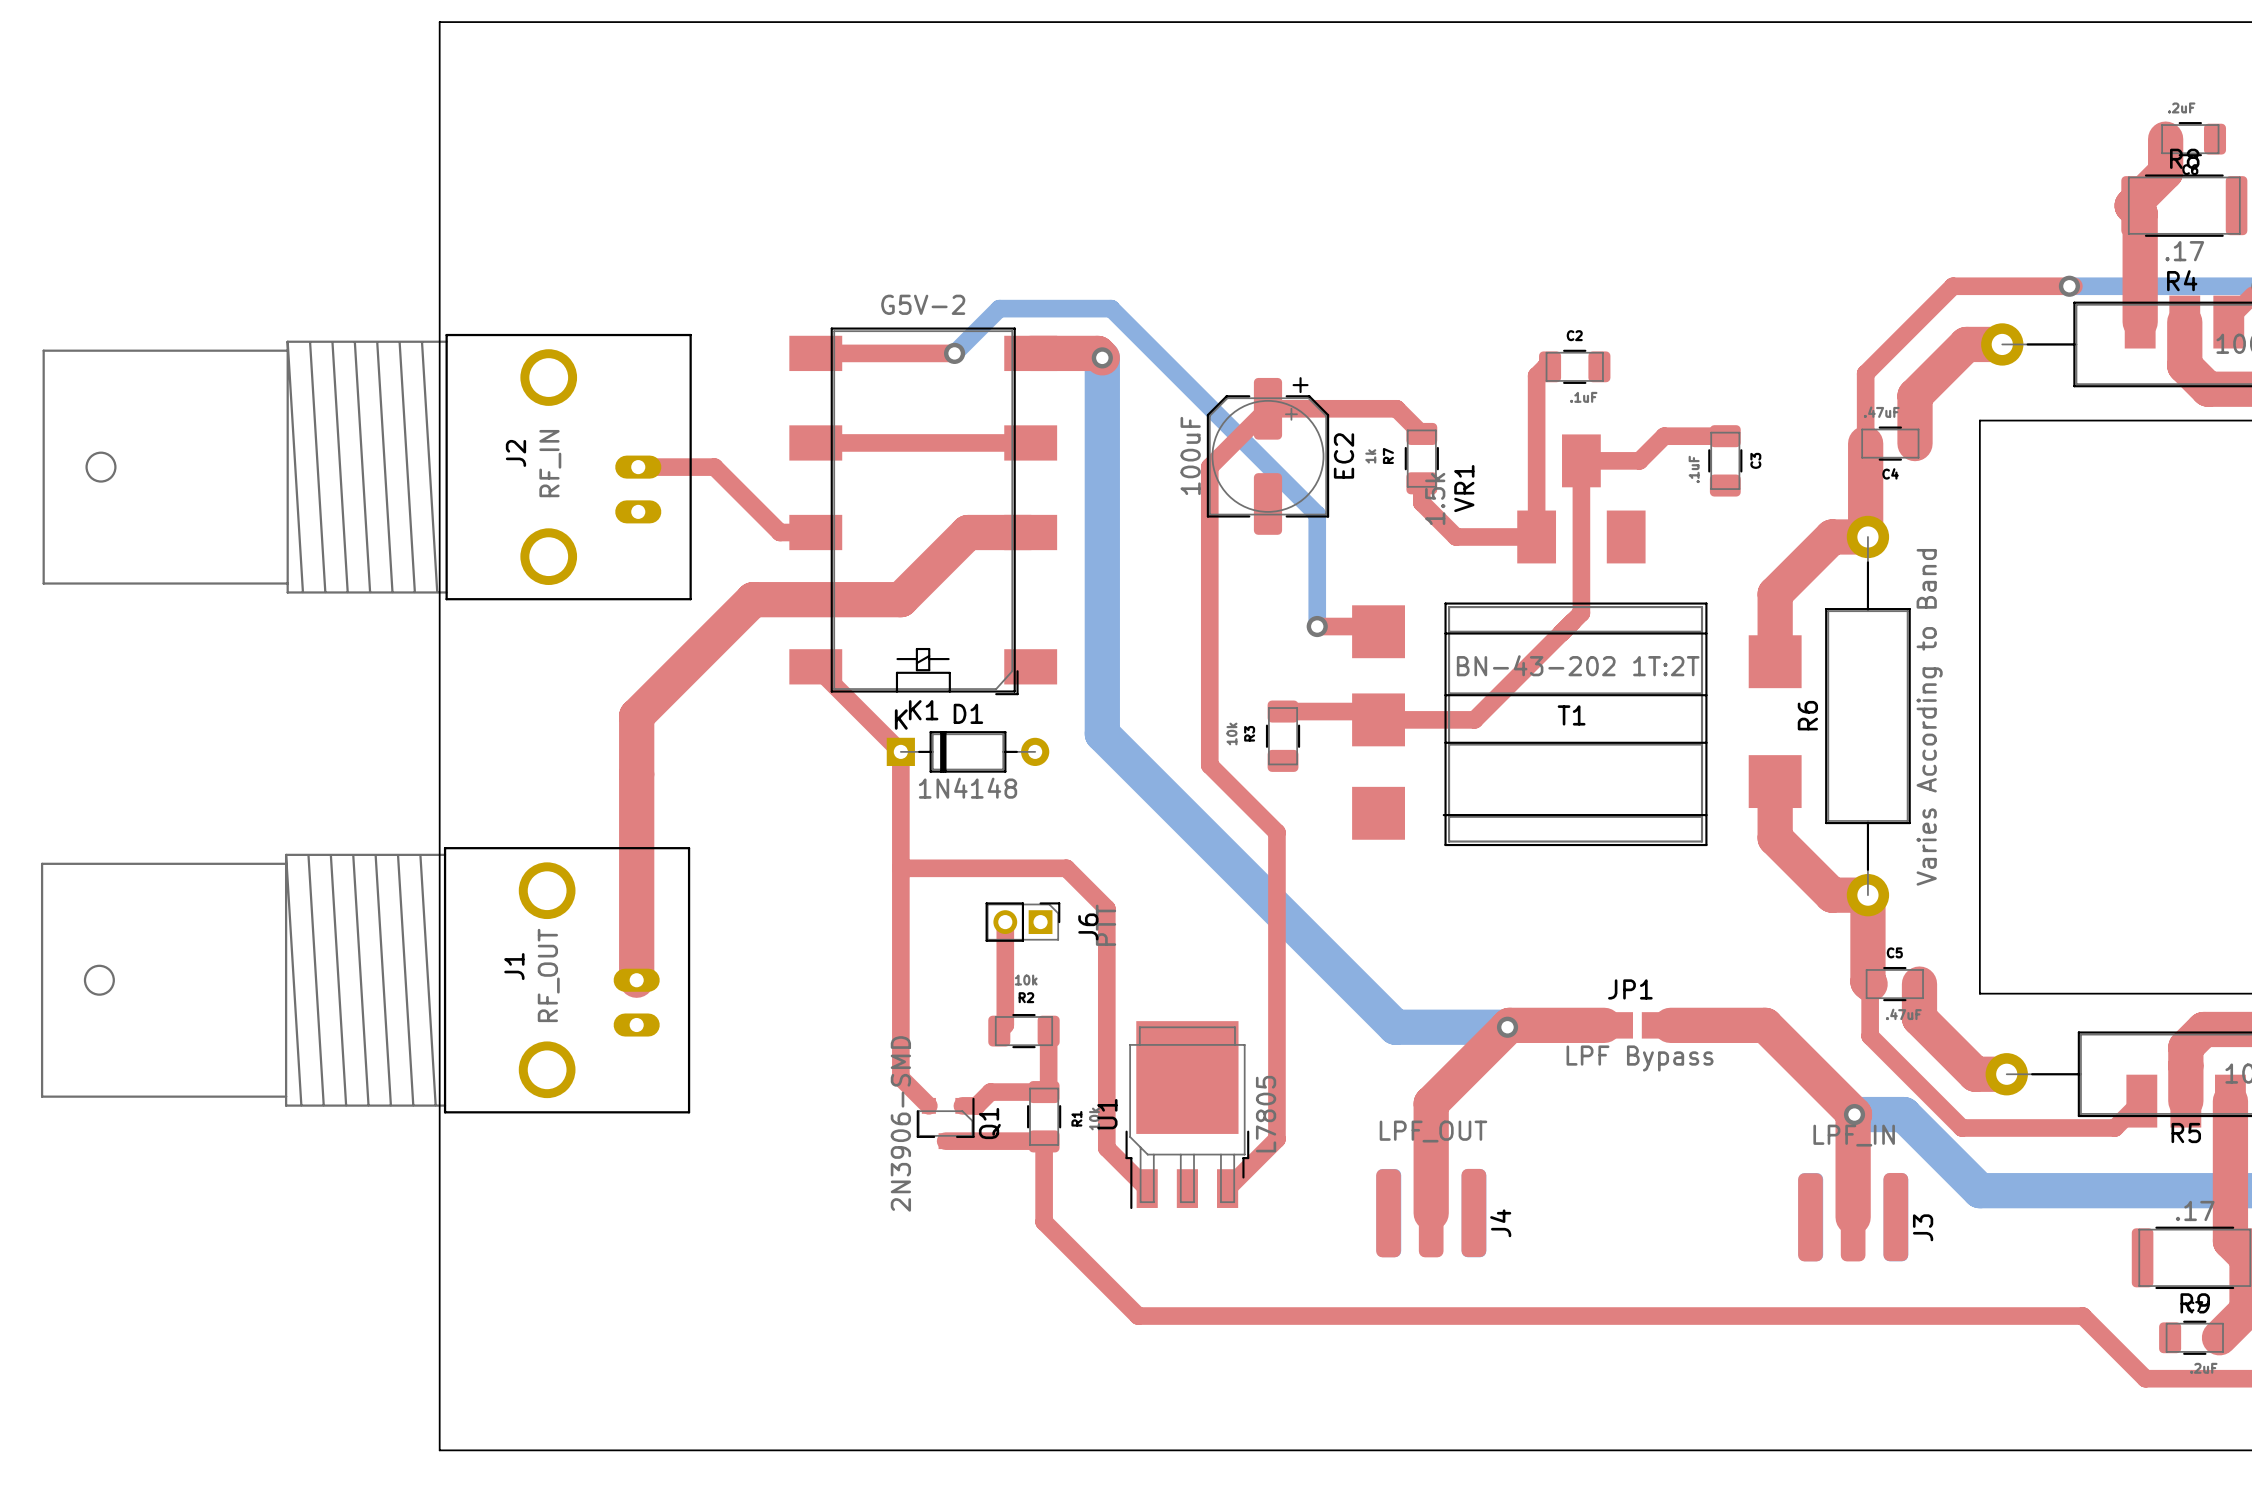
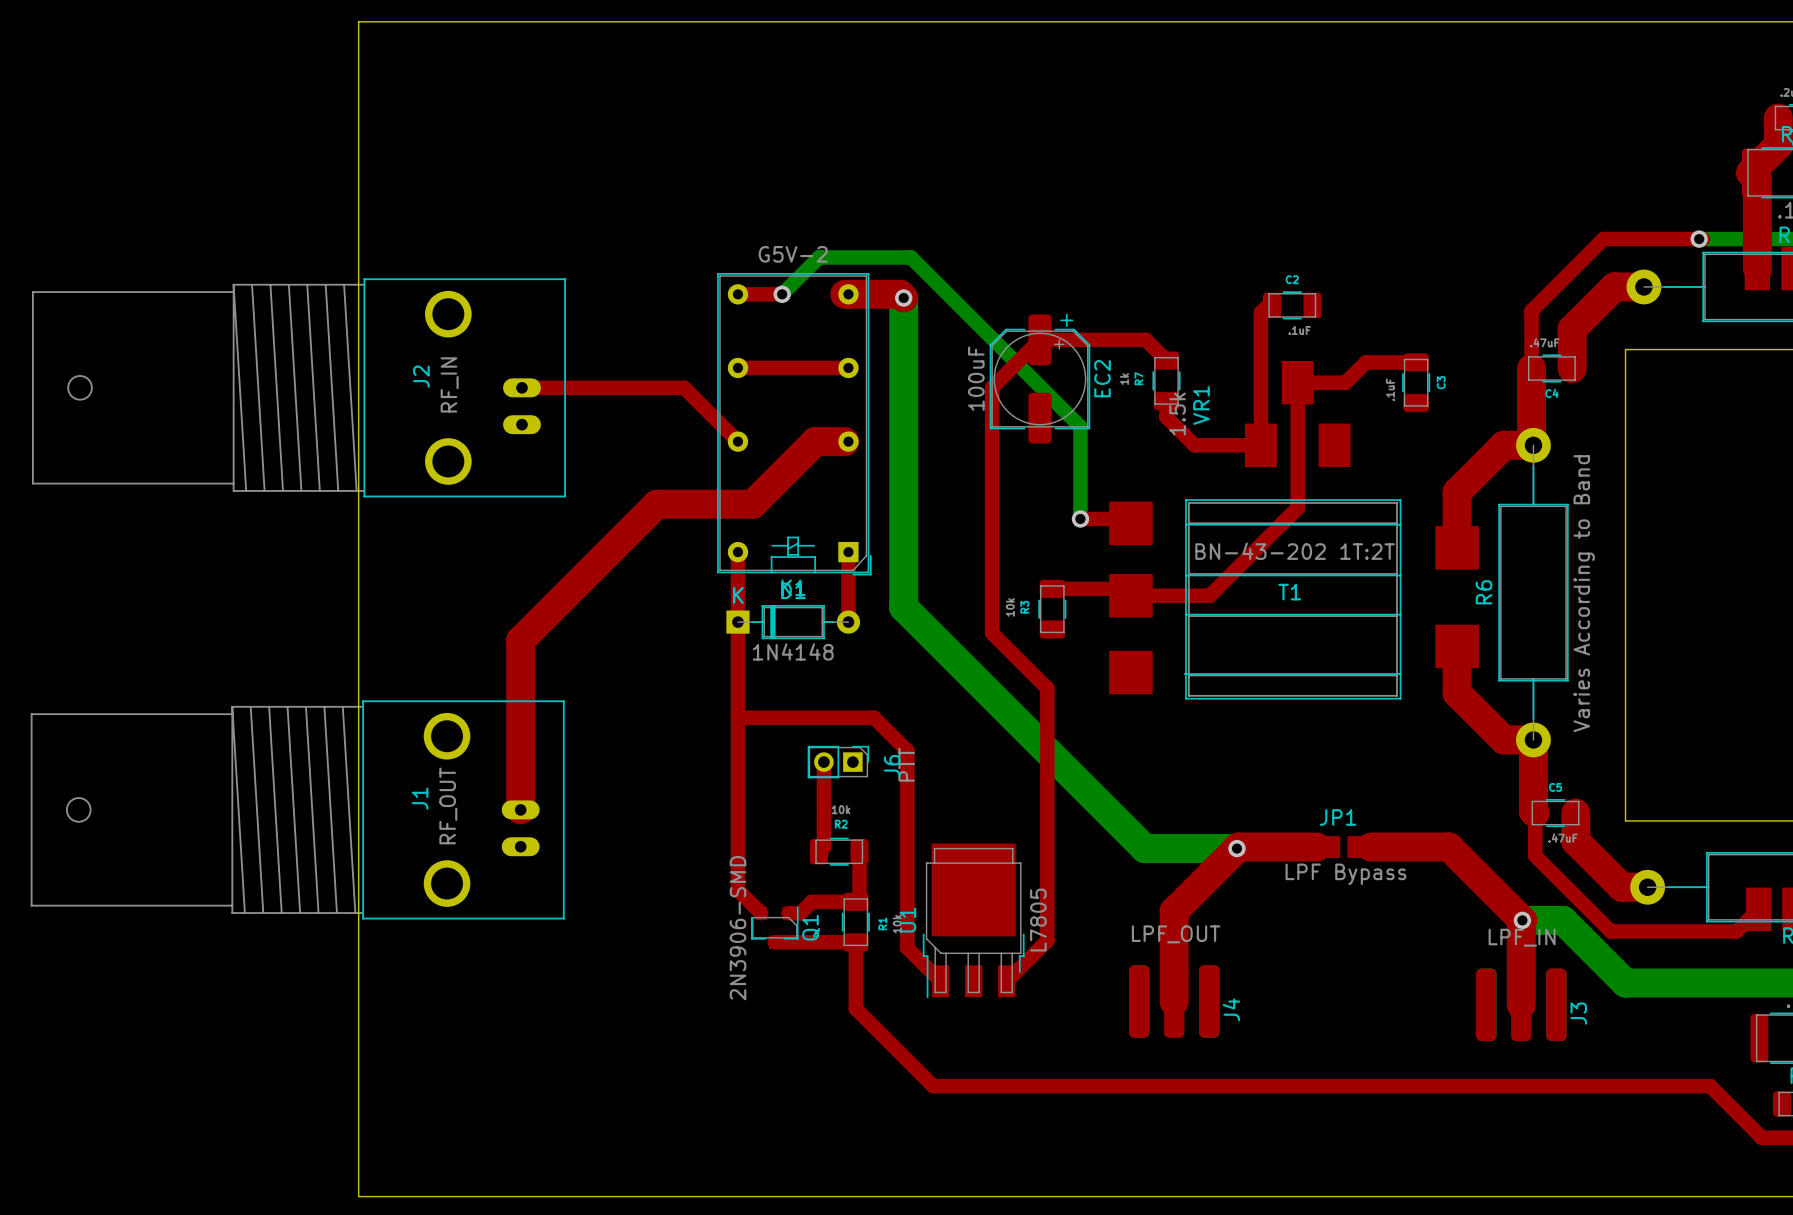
K1 footprint: [789, 327, 1058, 696] -> [717, 273, 872, 576]
top track: (815, 353) (900, 353) -> none
top track: (815, 442) (900, 442) -> none
top track: (714, 467) (779, 532) (815, 532) -> (584, 387) (684, 387) (737, 441)
top track: (994, 532) (968, 532) (900, 599) (753, 599) (636, 716) (636, 774) -> (815, 441) (752, 504) (656, 504) (520, 640)
top track: (815, 666) (900, 751) -> (737, 552) (737, 622)
top track: none -> (848, 552) (848, 622)

